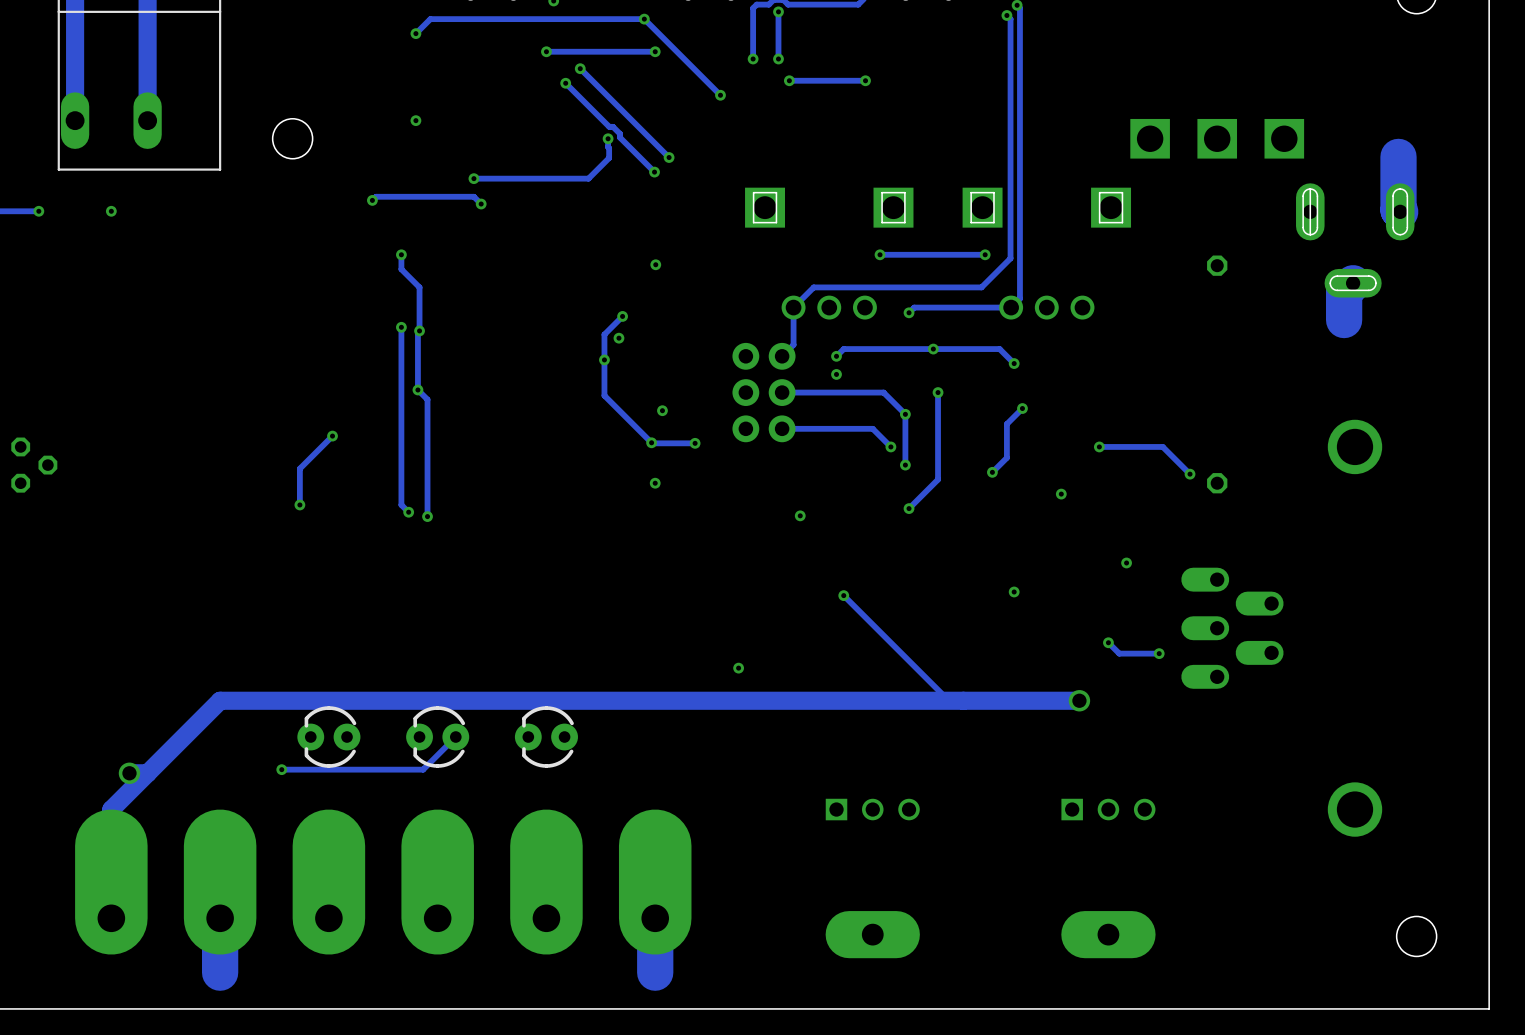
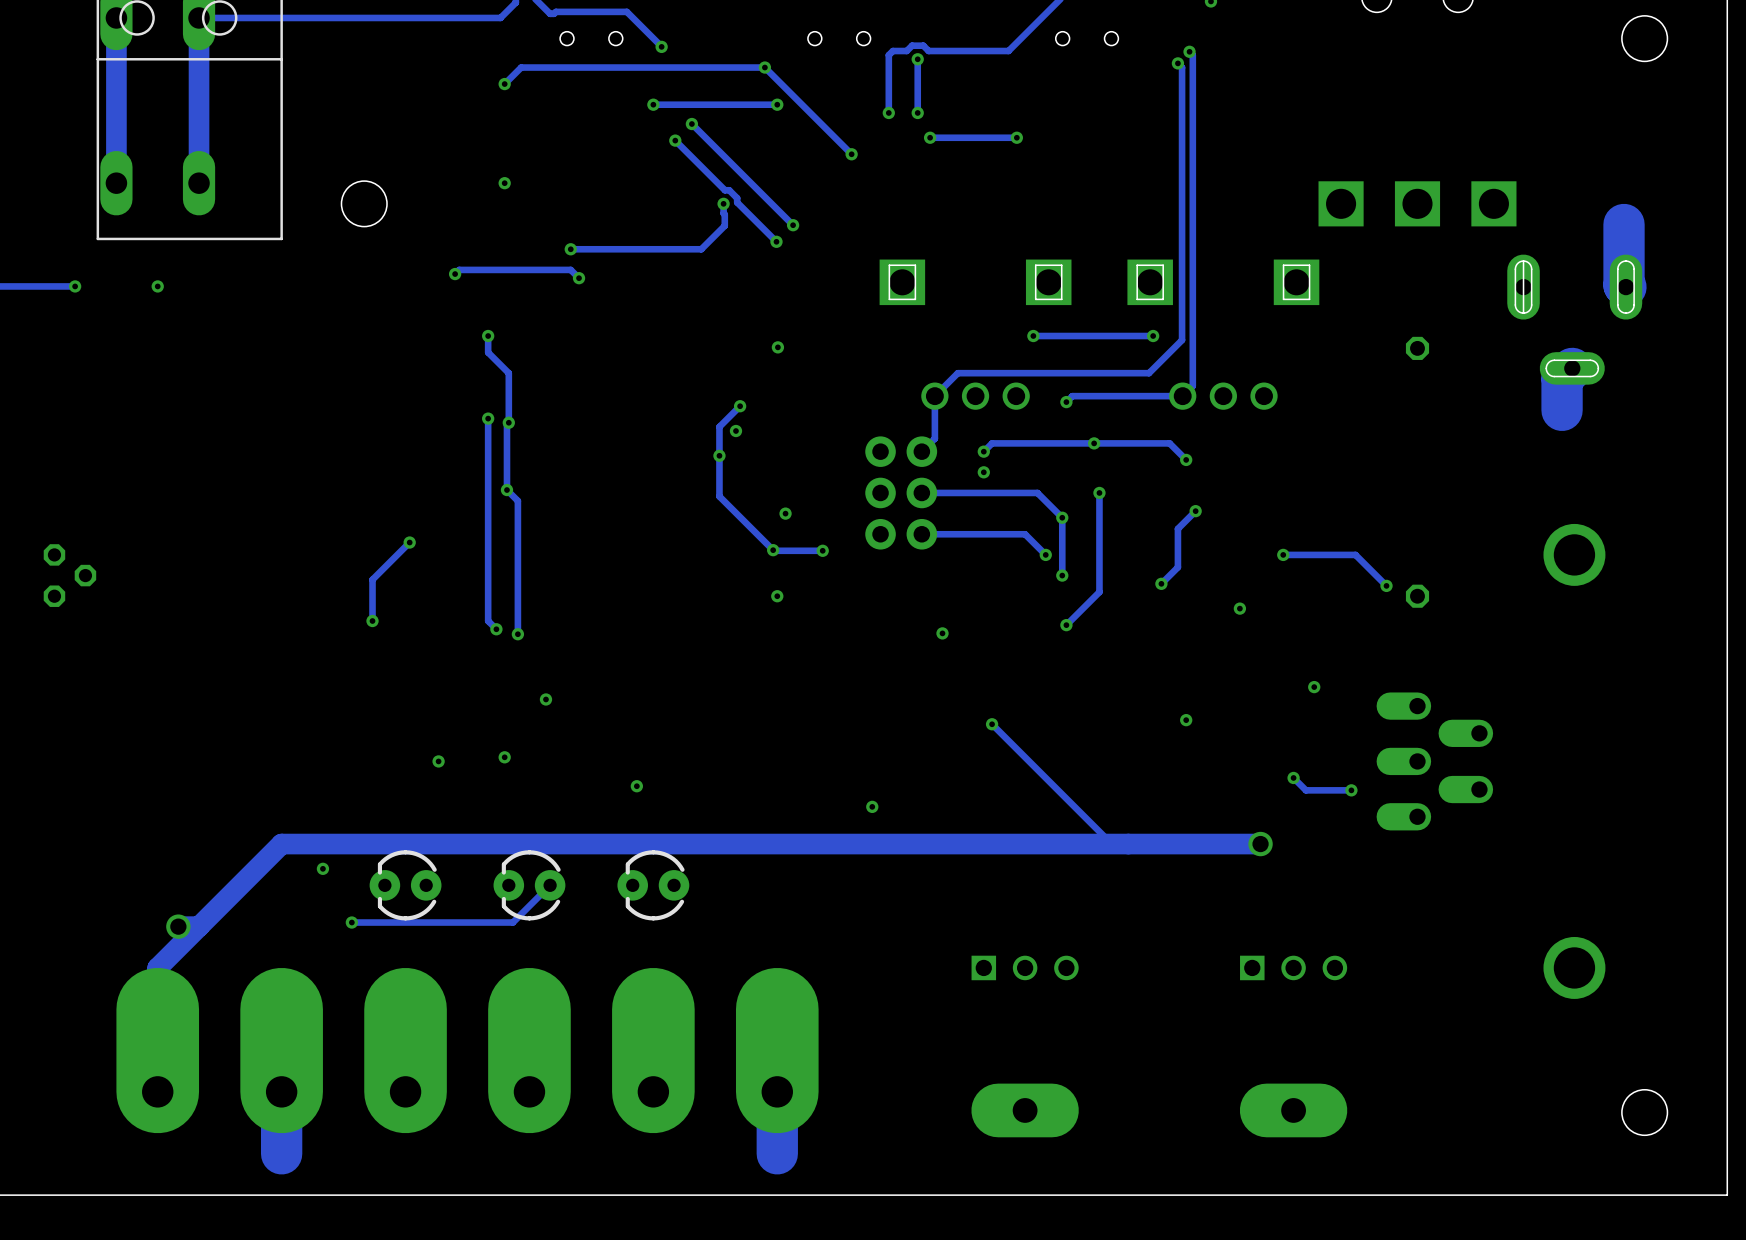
via: none -> (545, 699)
via: none -> (504, 757)
via: none -> (438, 761)
via: none -> (636, 786)
via: none -> (322, 868)

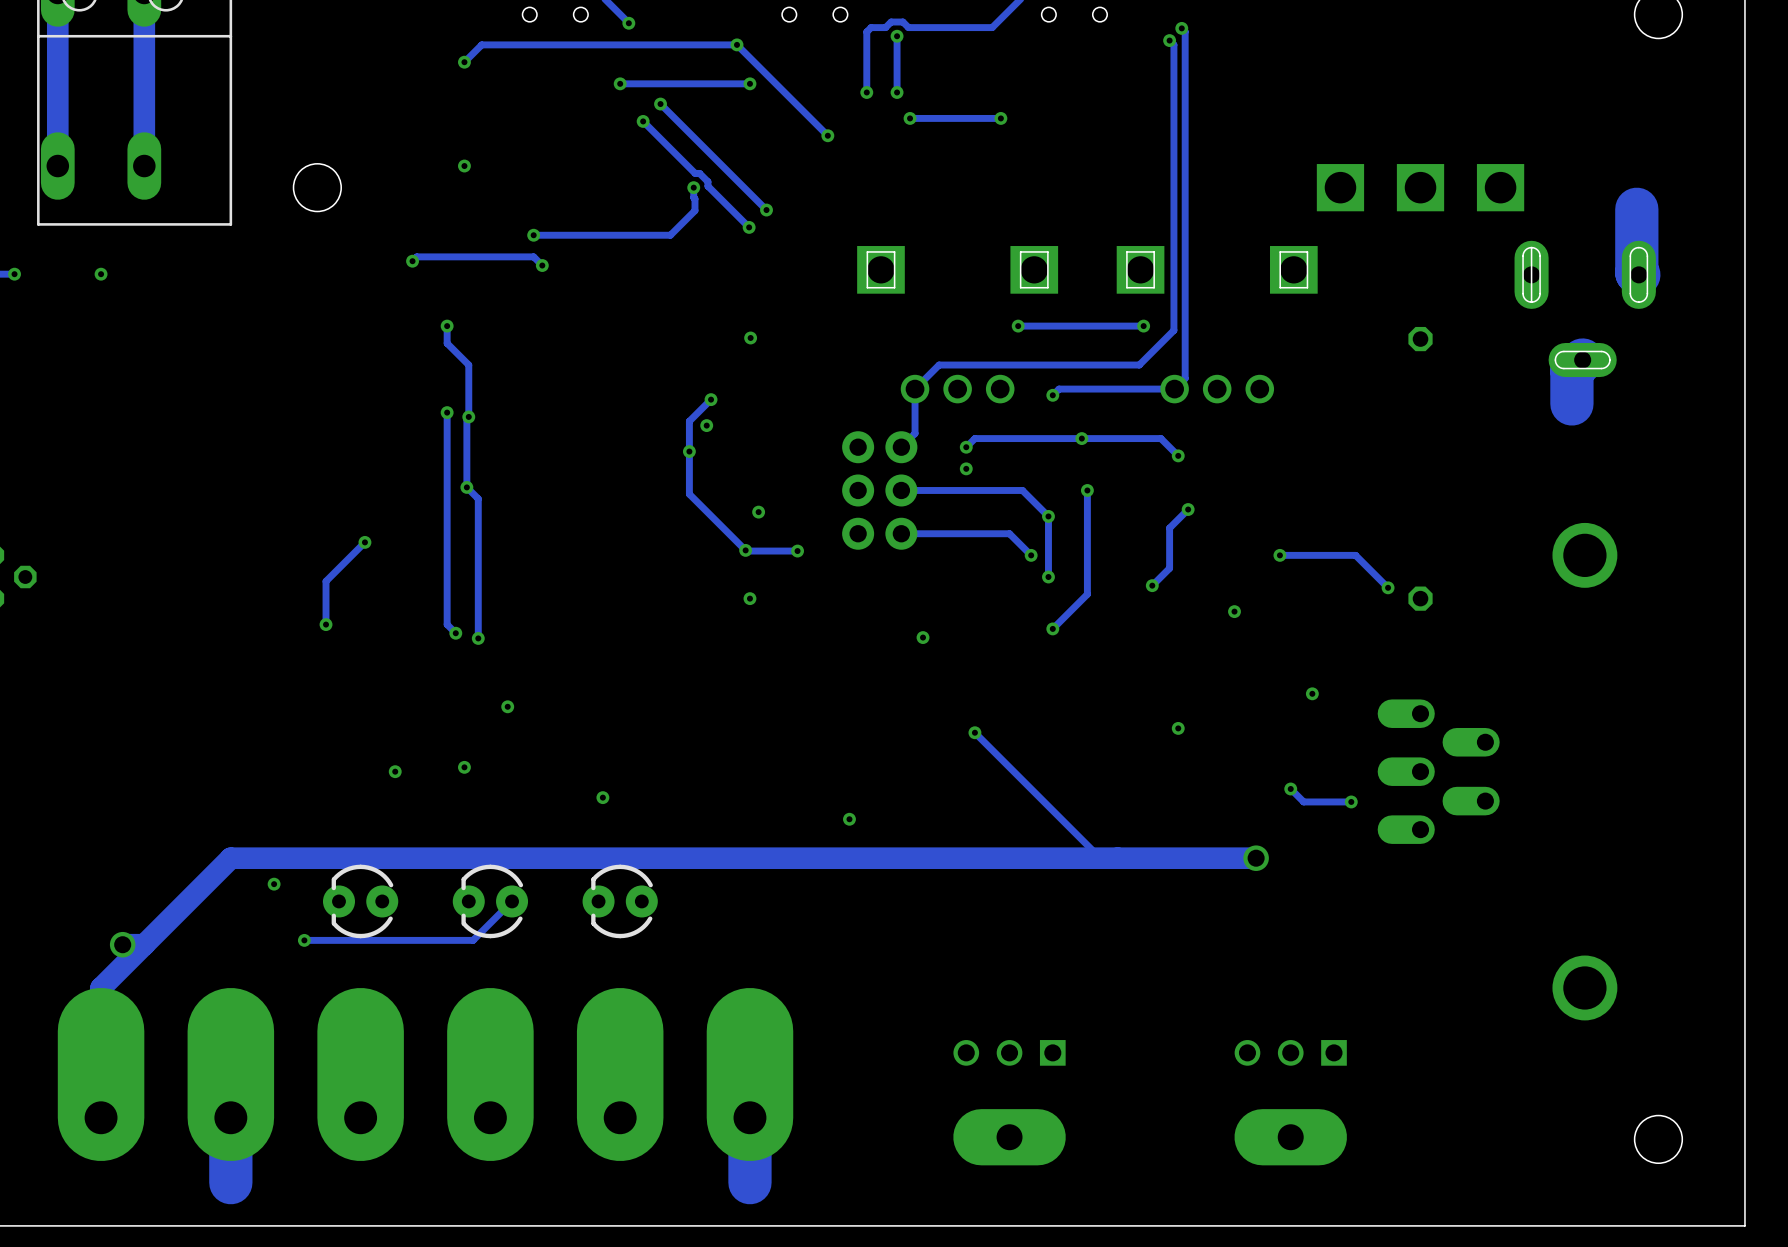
part rotation: 0° (1025, 967) -> 180° (1009, 1052)
part rotation: 0° (1293, 967) -> 180° (1290, 1052)

